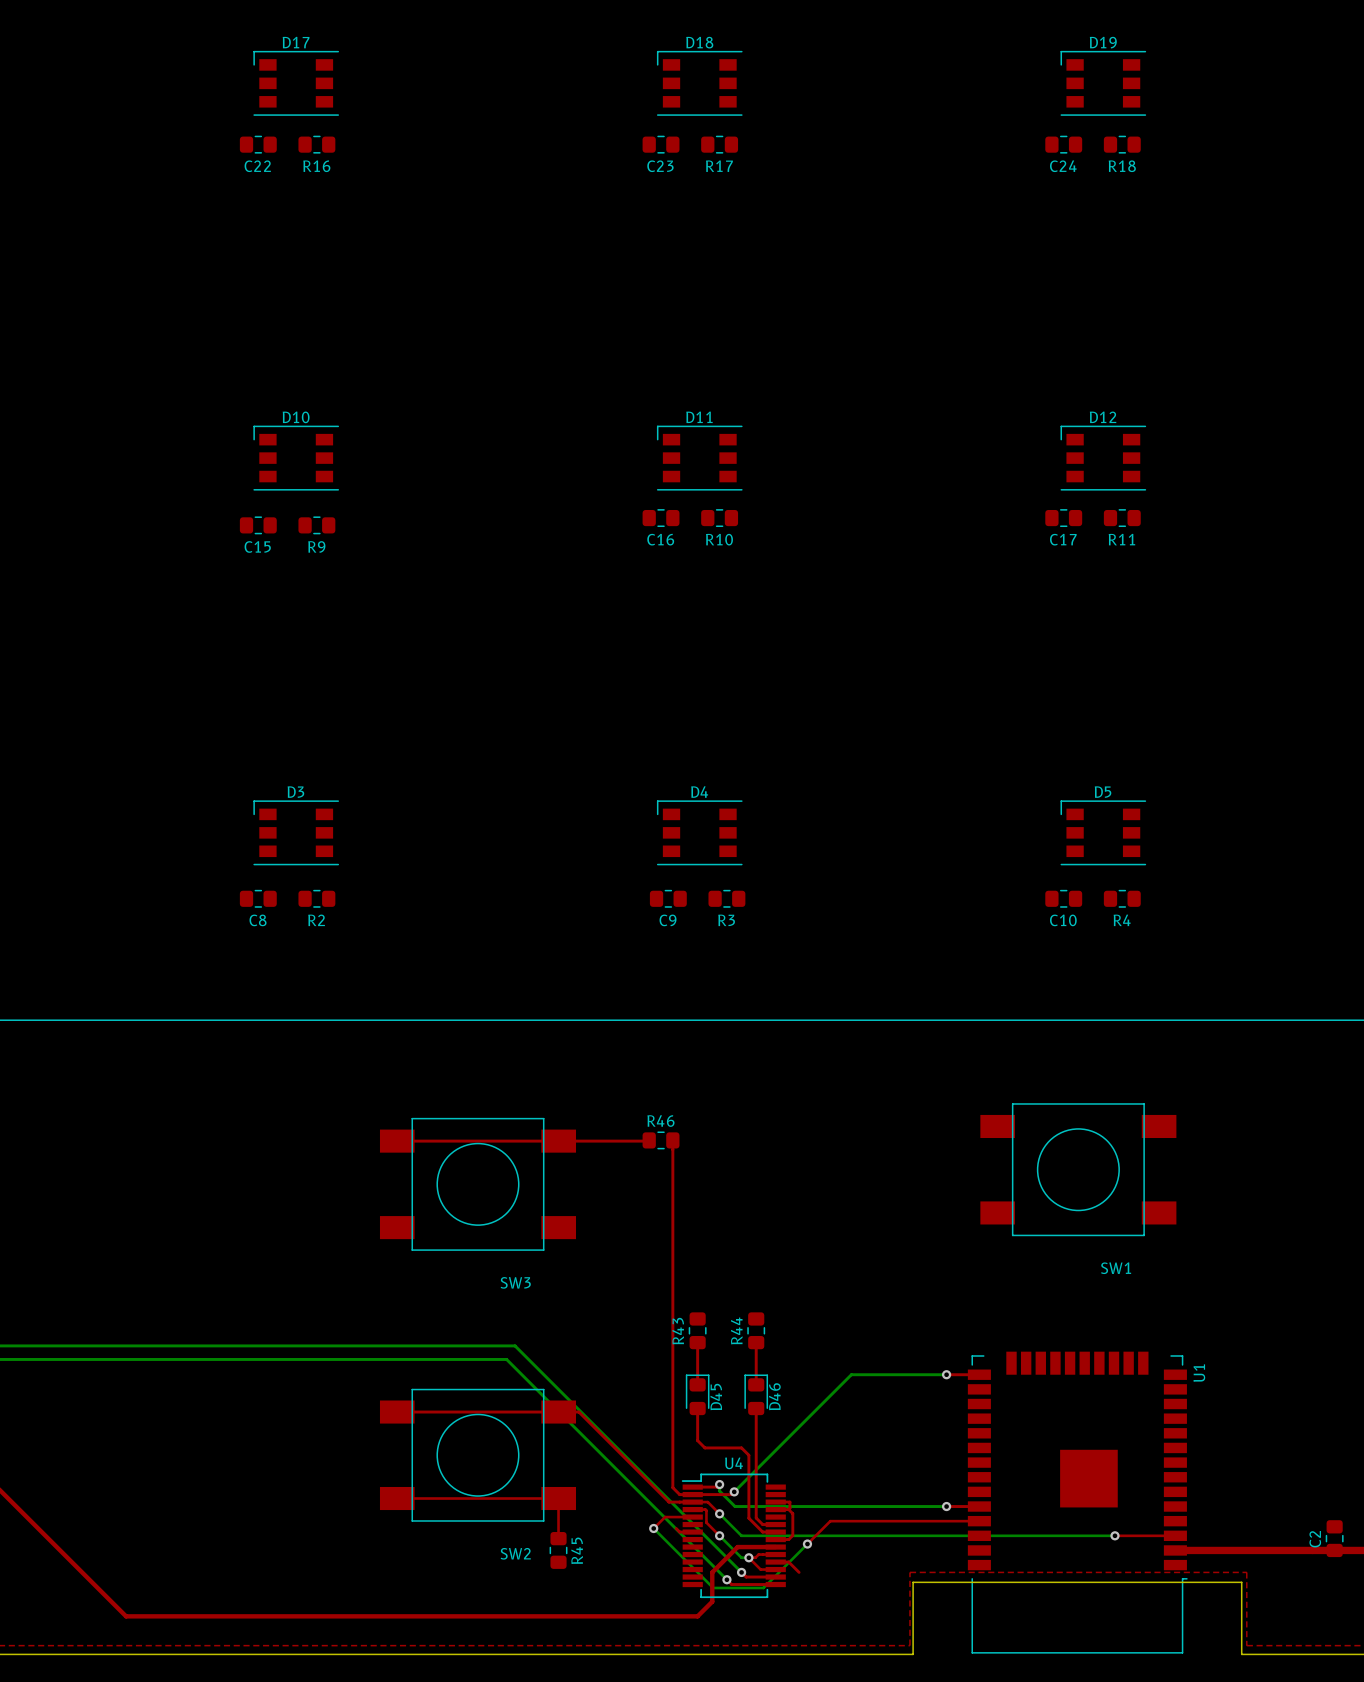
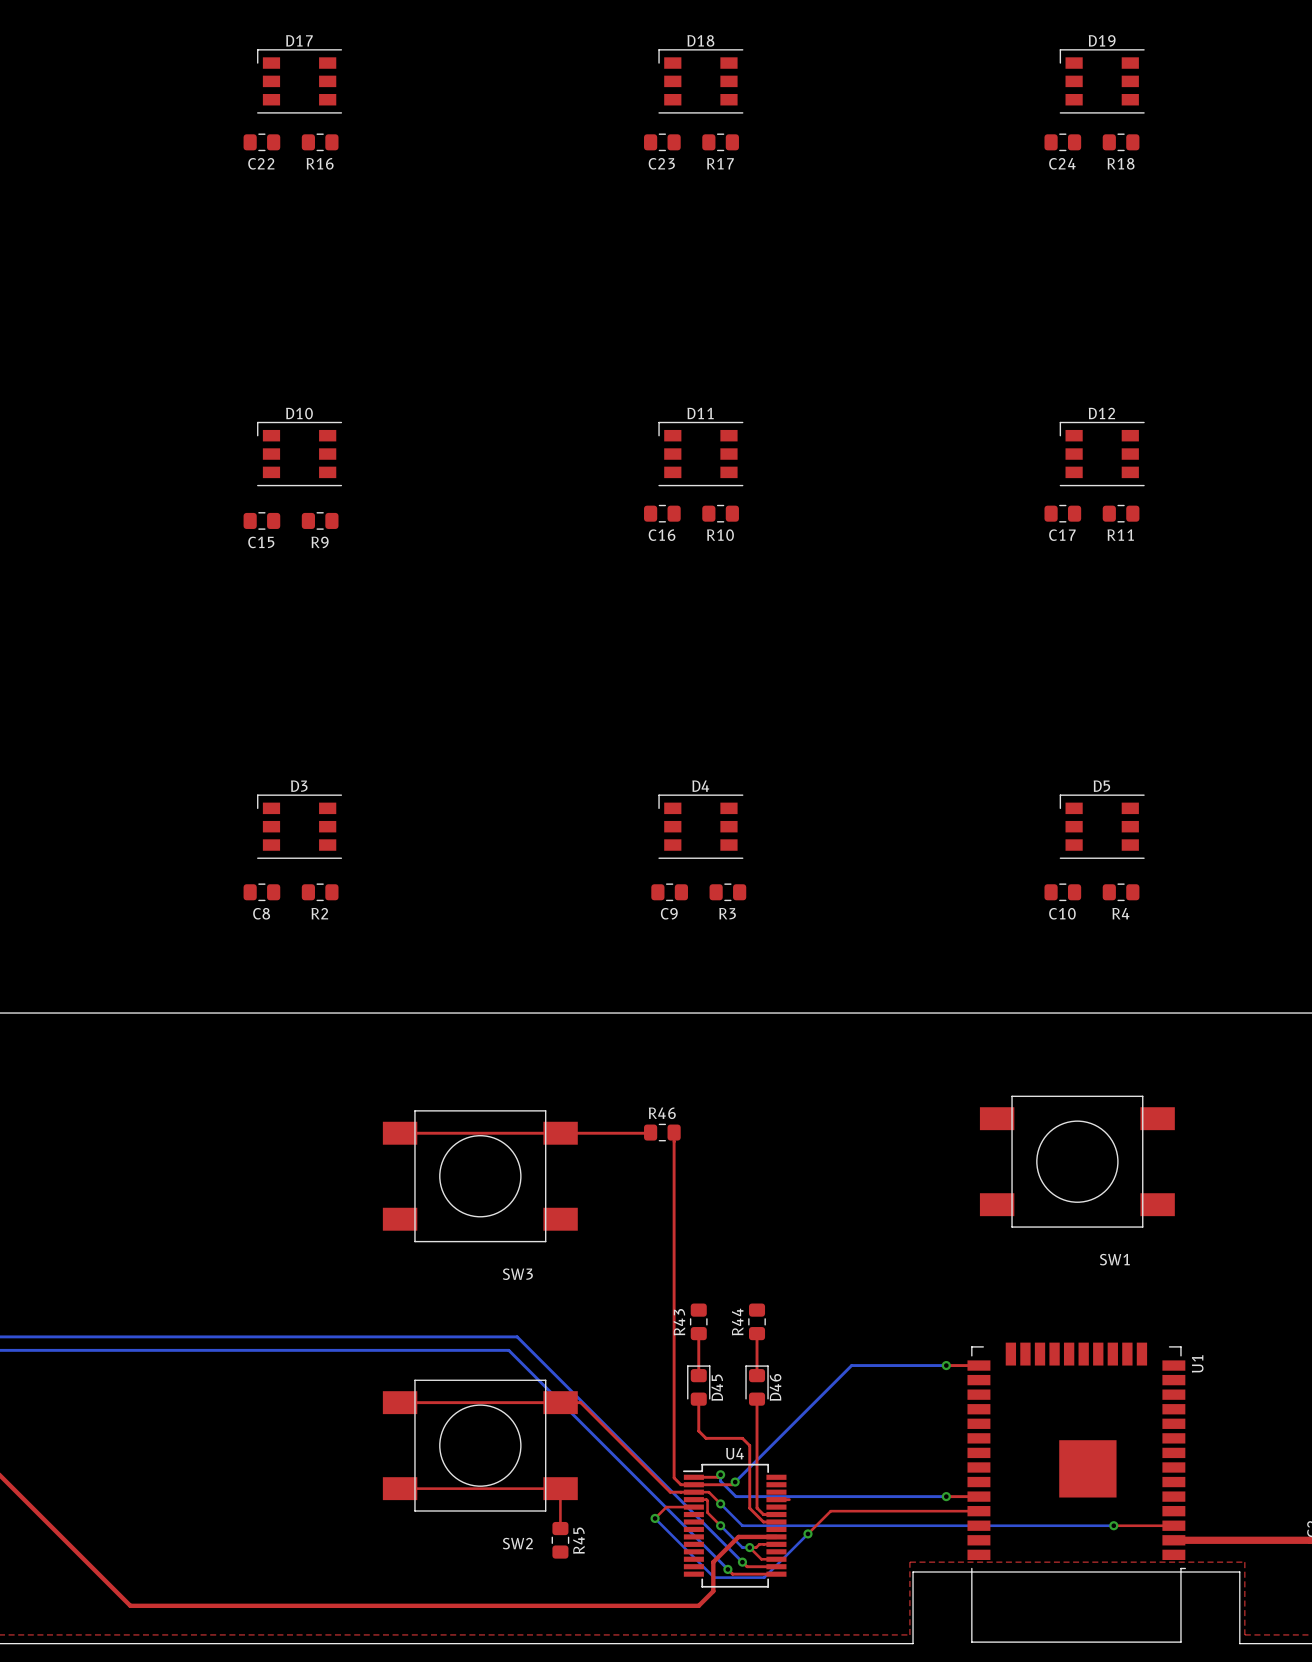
top track: (775, 1502) (789, 1502) (788, 1509) (792, 1513) (792, 1535) (788, 1539) (775, 1539) -> none
top track: (676, 1528) (679, 1532) (692, 1532) -> none
top track: (775, 1562) (788, 1562) (799, 1572) -> none

